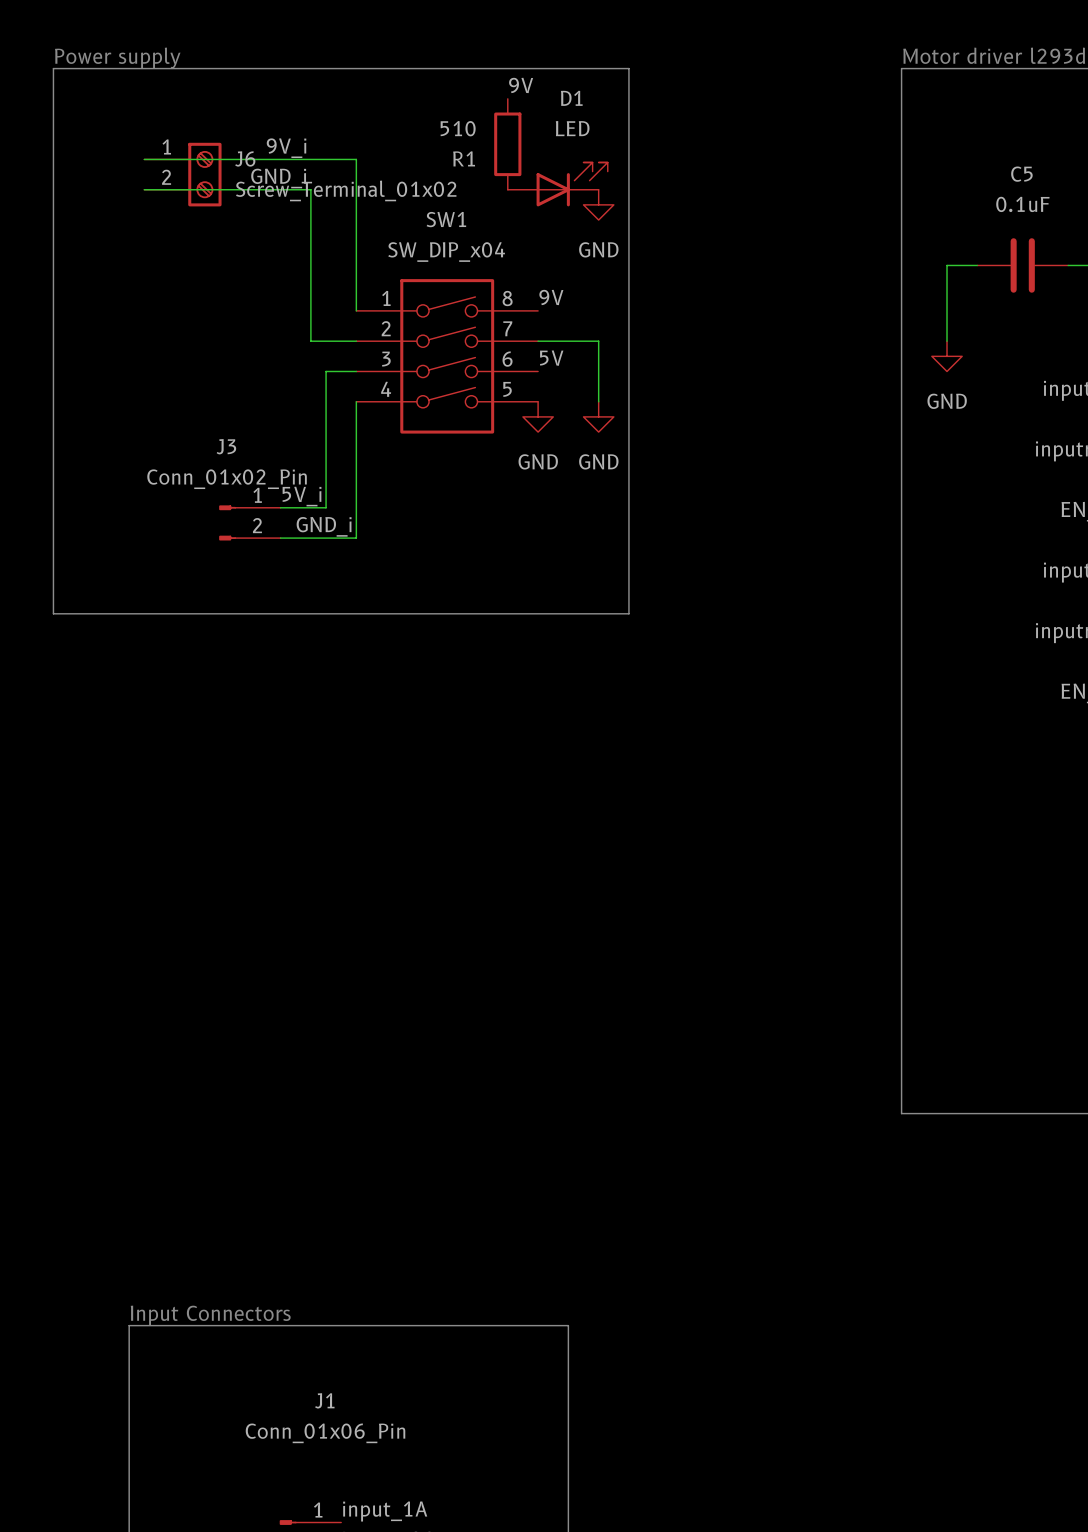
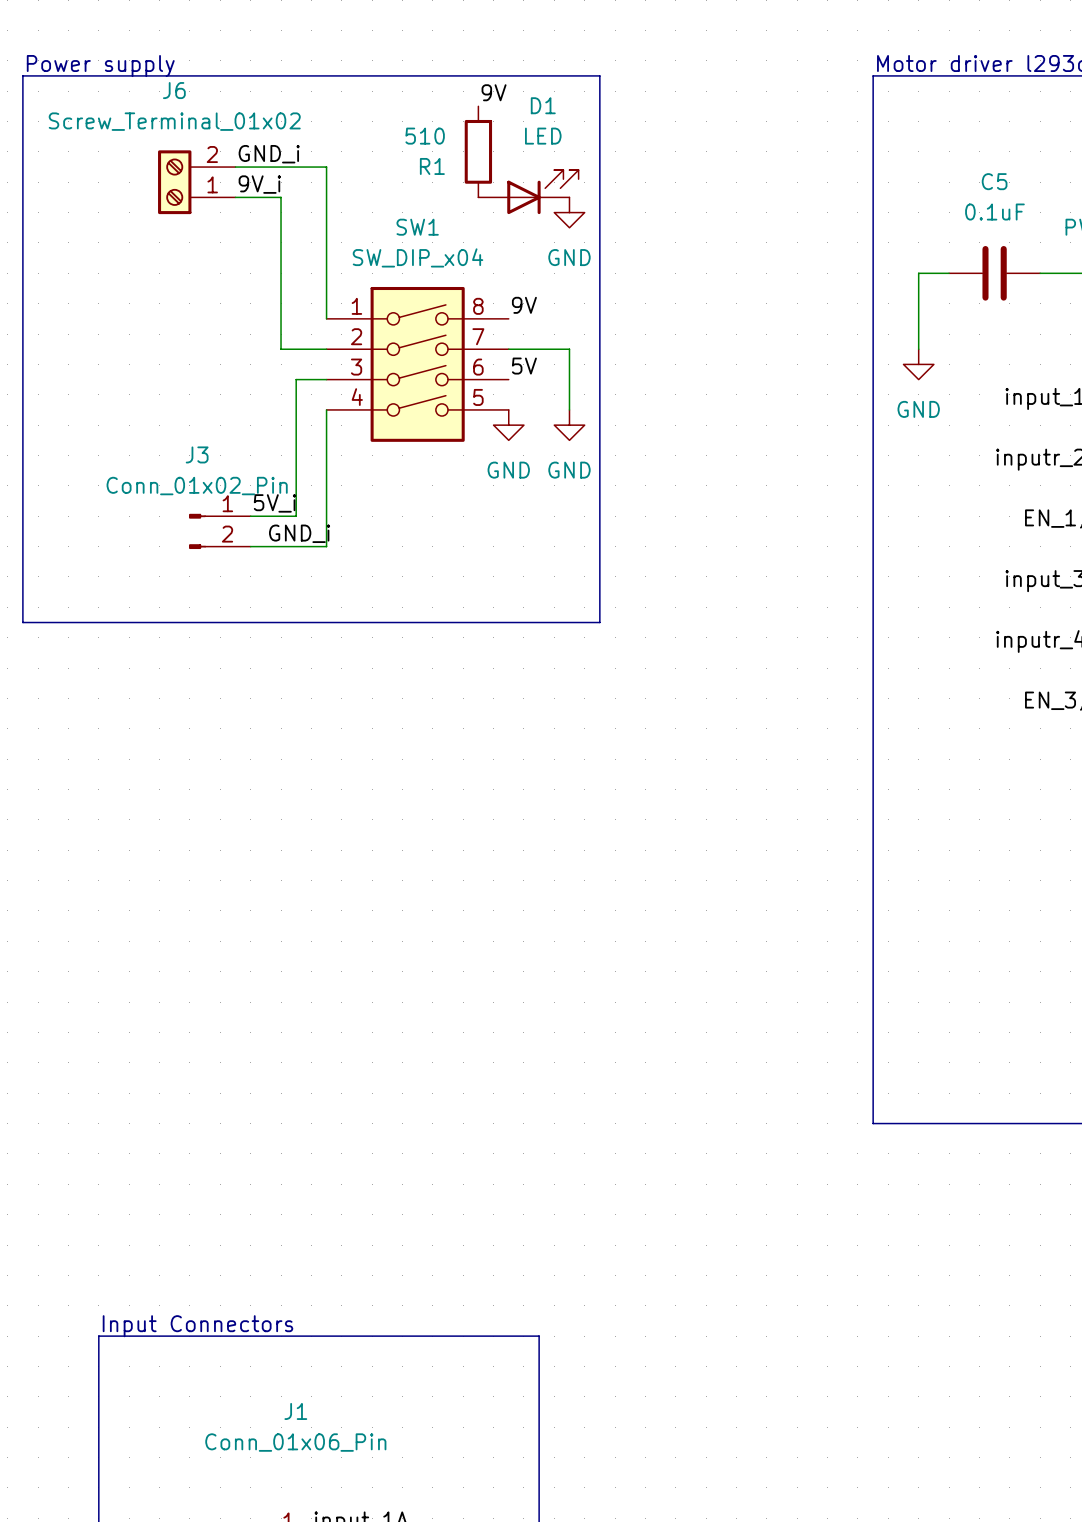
label: 9V_i (286, 148) -> GND_i (269, 154)
J6 name position: J6 (245, 158) -> J6 (174, 90)
J6 rotation: 0° (204, 174) -> 180° (174, 182)
label: GND_i (278, 178) -> none
label: none -> 9V_i (259, 184)
J6 value position: Screw_Terminal_01x02 (346, 190) -> Screw_Terminal_01x02 (174, 121)

